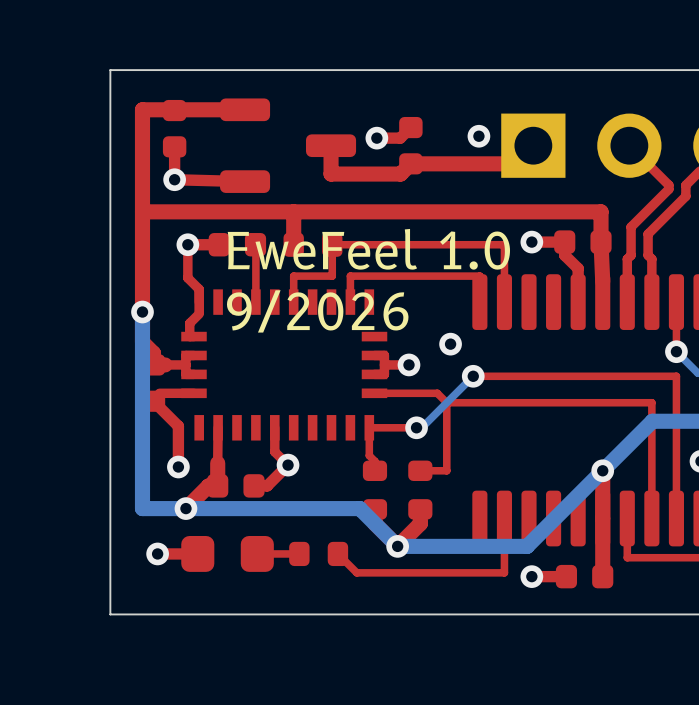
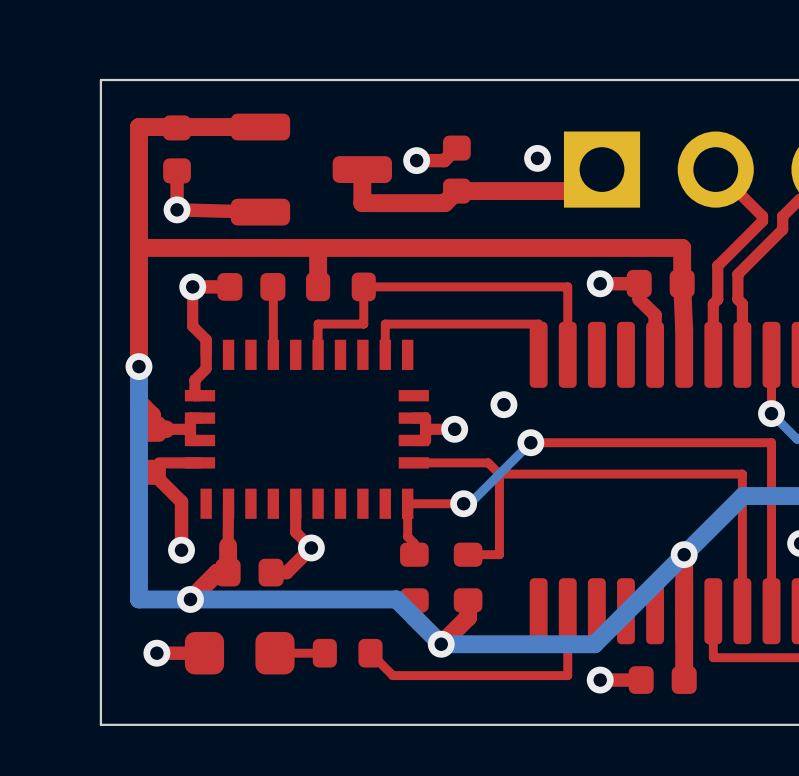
text: EweFeel 1.0 (368, 249) -> none
text: 9/2026 (317, 311) -> none

